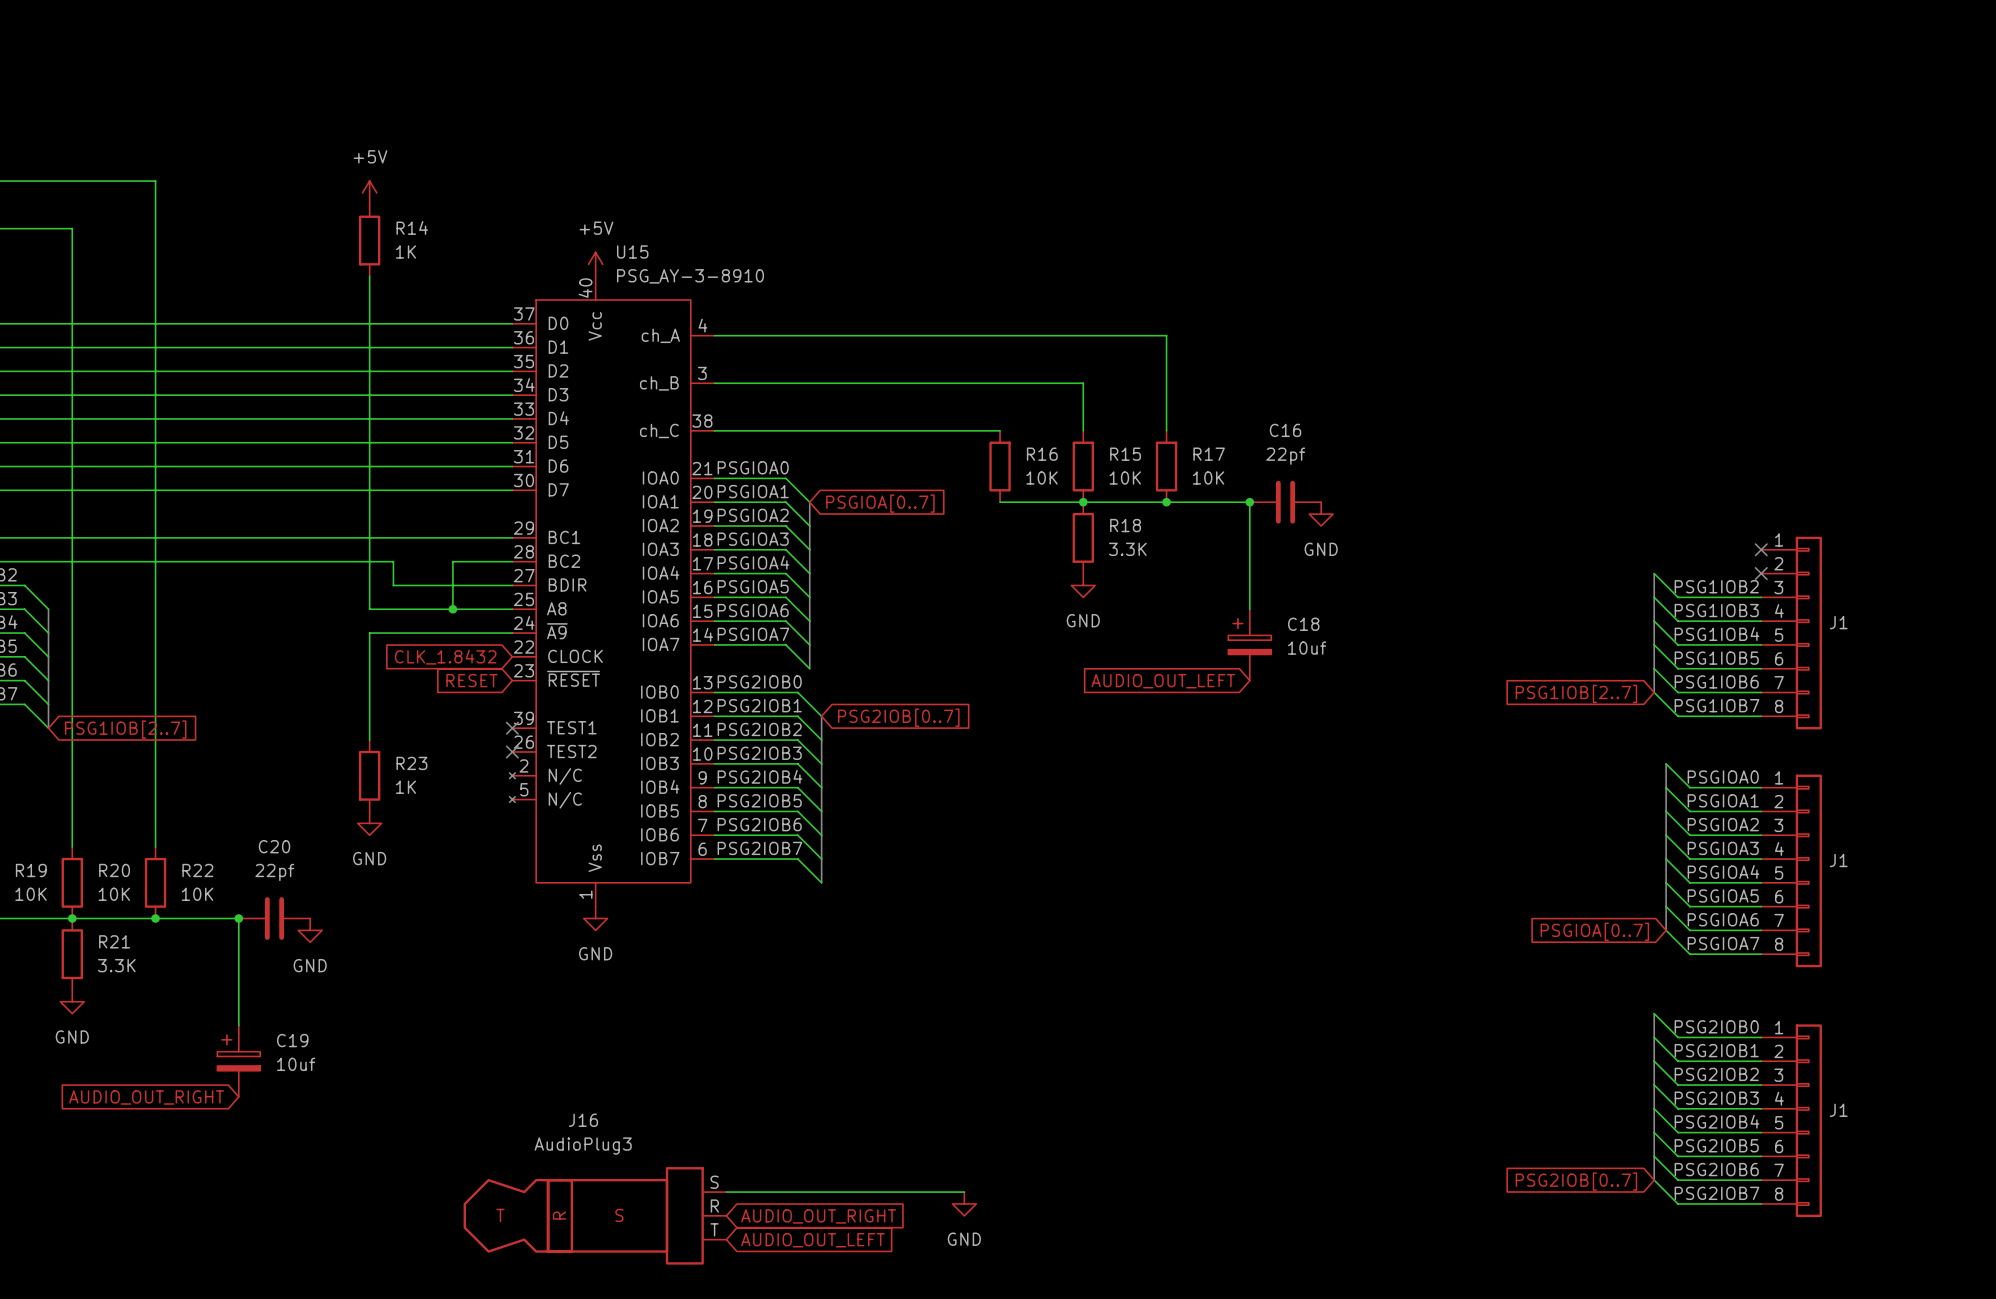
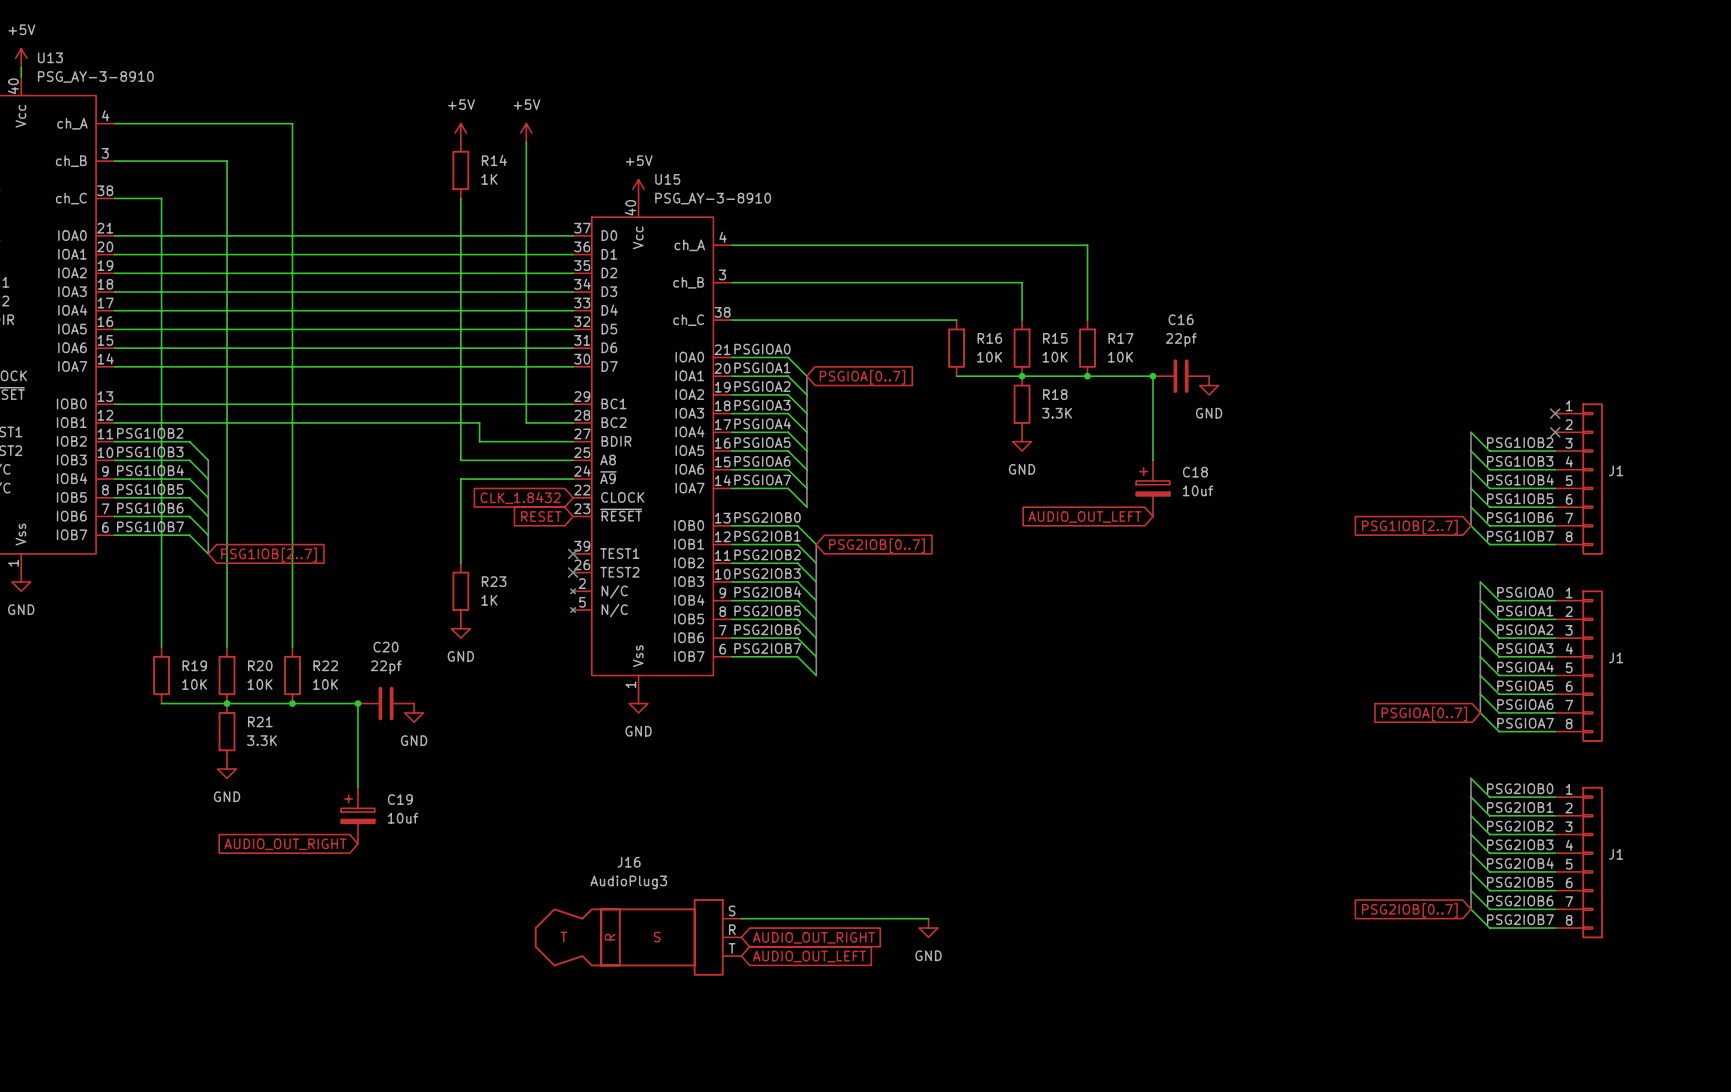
power symbol: none -> +5V (526, 133)
wire: (452, 561) (452, 609) -> (526, 422) (526, 142)
junction: (452, 609) -> none

